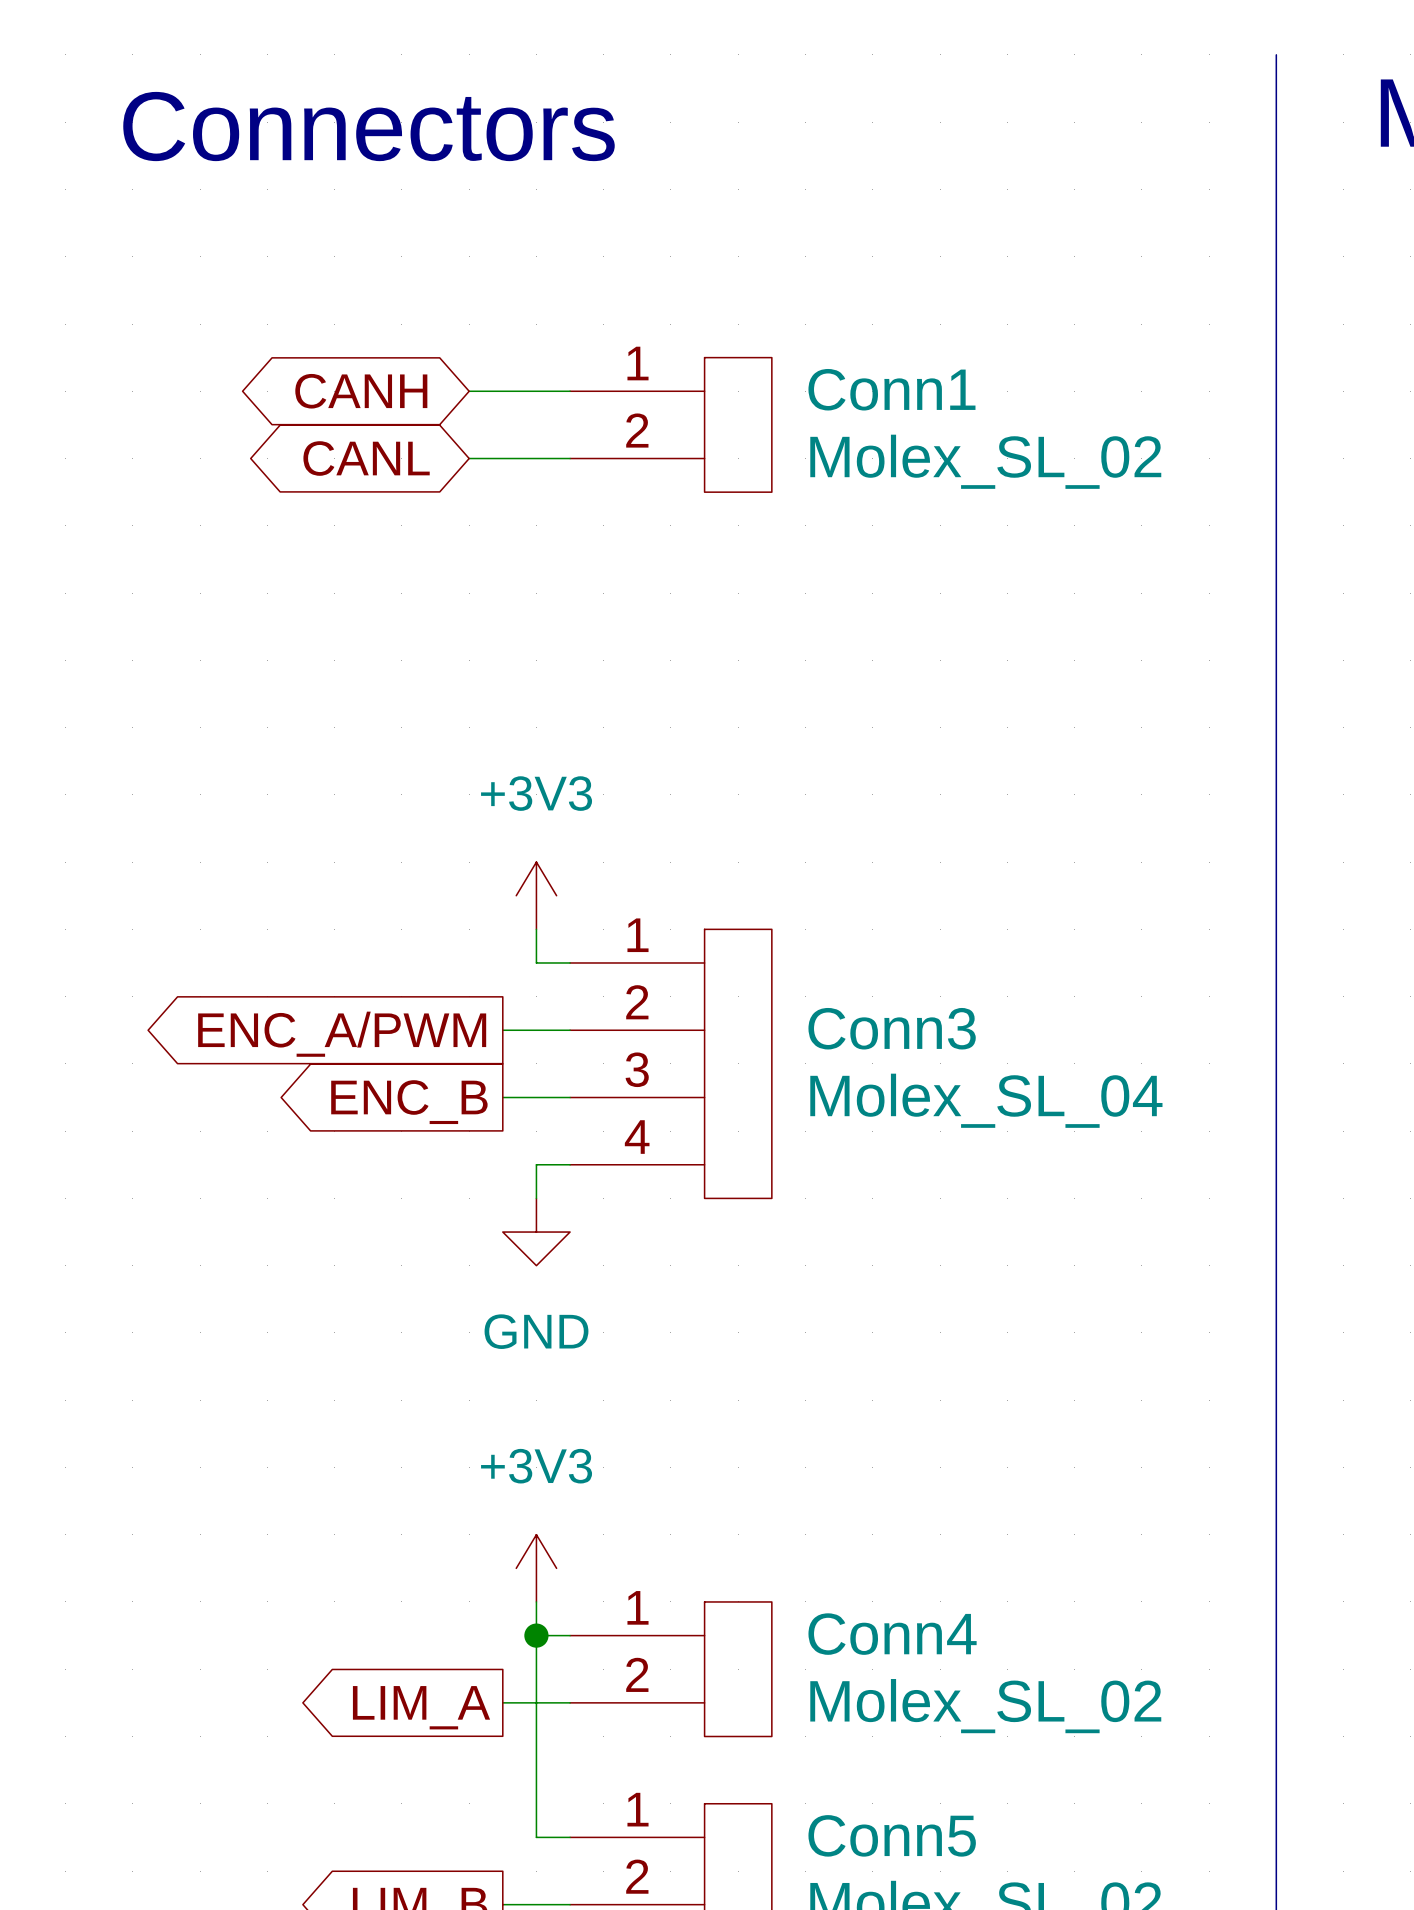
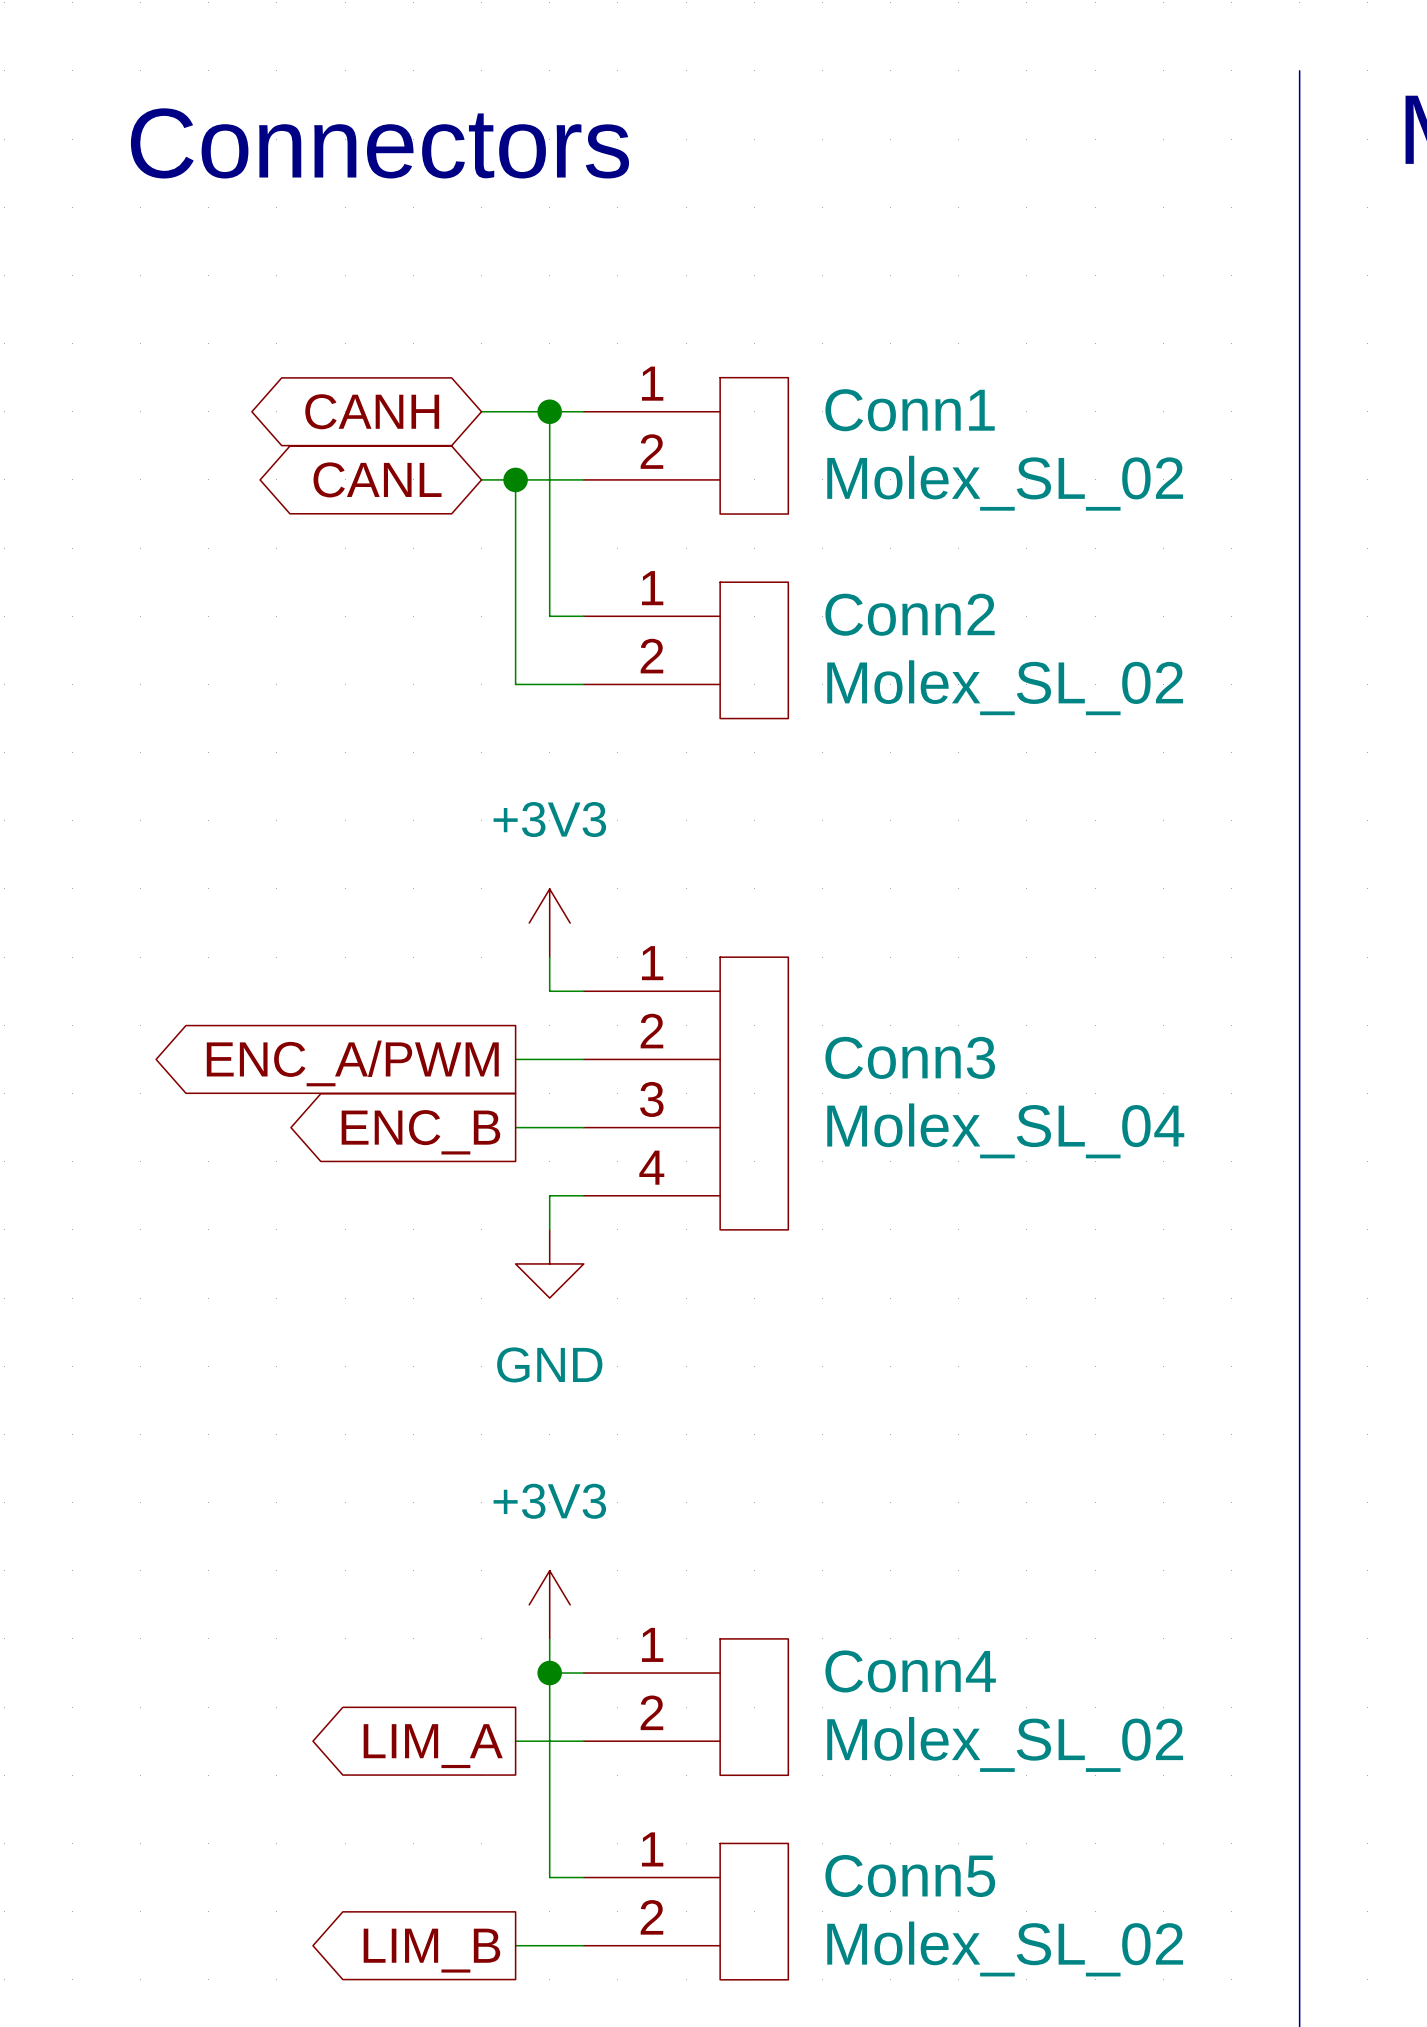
wire: none -> (549, 411) (549, 616) (583, 616)
junction: none -> (549, 411)
wire: none -> (515, 479) (515, 684) (583, 684)
junction: none -> (515, 479)
Conn2: none -> Molex_SL_02 (686, 650)

